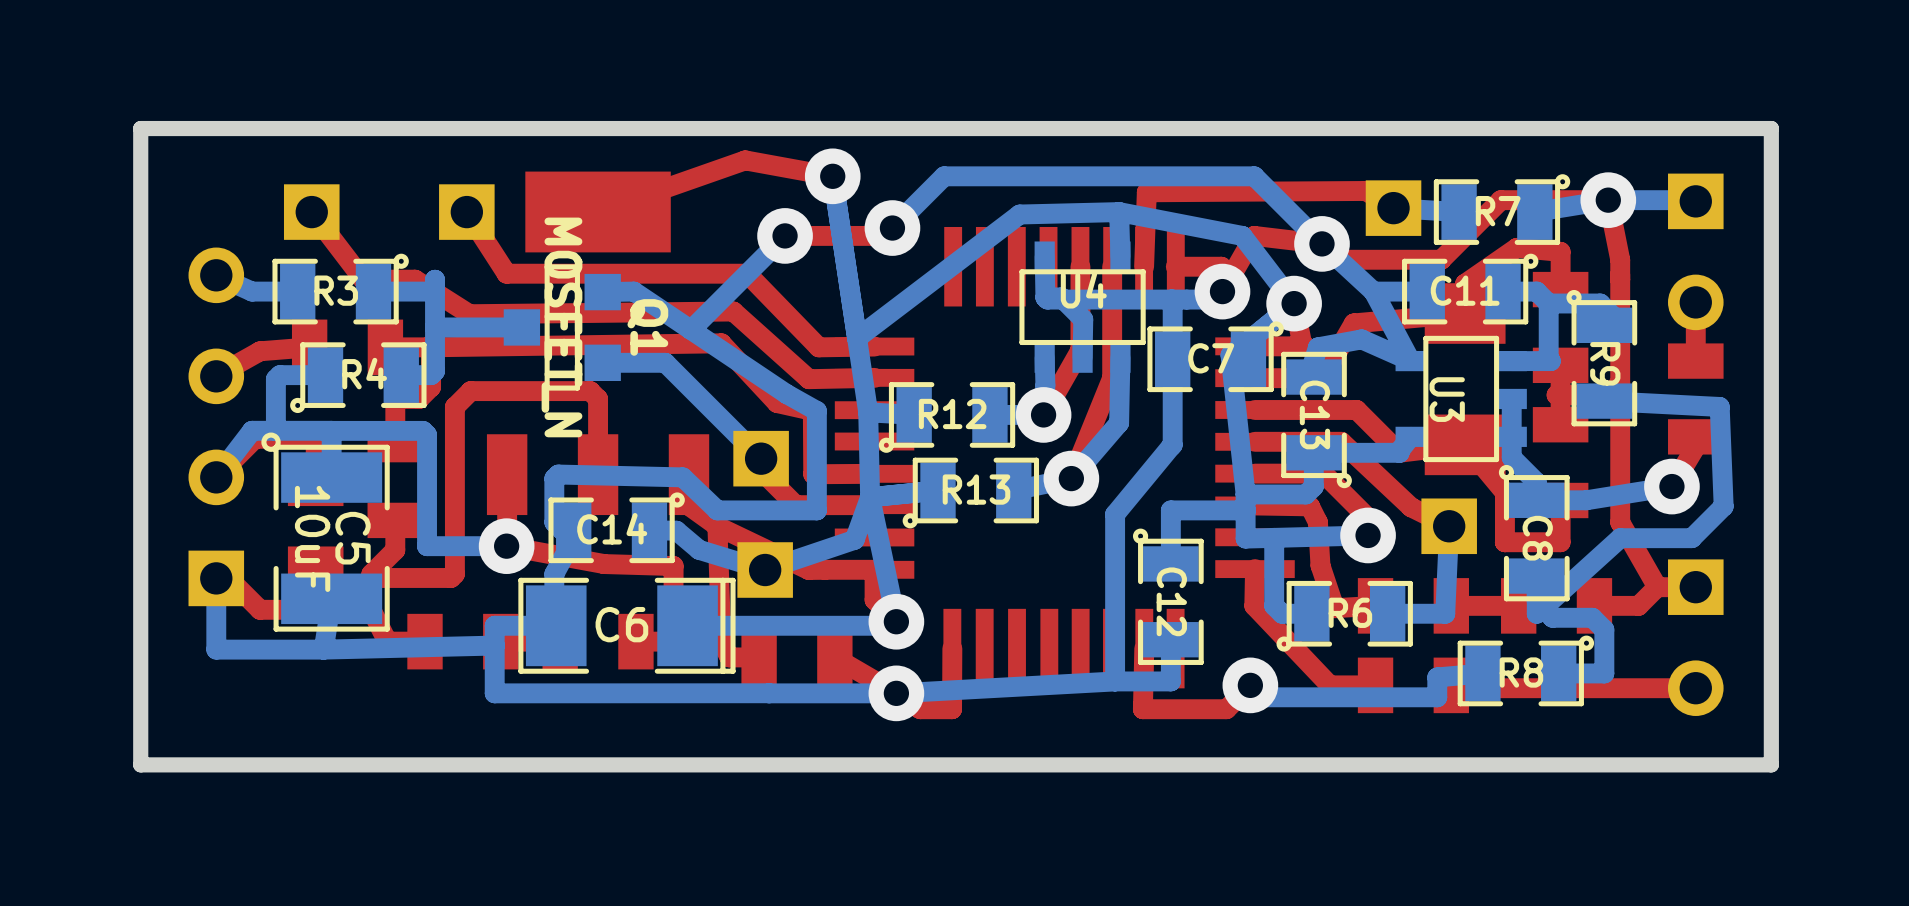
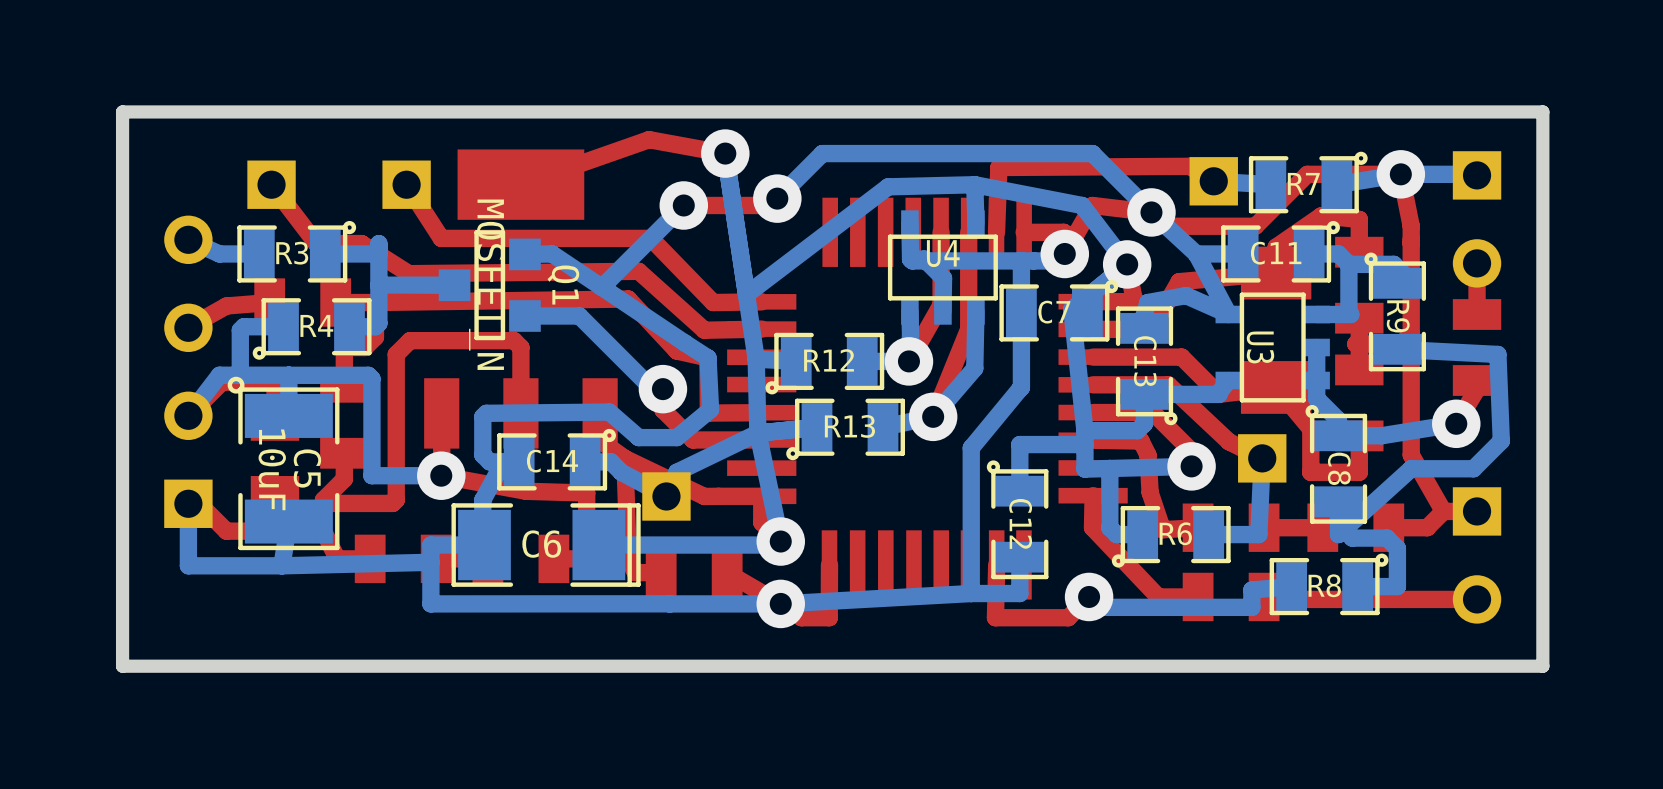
bottom track: (786, 393) (816, 410) (816, 510) (717, 510) (682, 477) (558, 474) -> (685, 343) (707, 357) (710, 409) (676, 437) (638, 437) (609, 412) (486, 413)
via: none -> (662, 389)
part: (761, 458) -> none
bottom track: (870, 497) (854, 539) (765, 570) (699, 549) (676, 530) (649, 530) -> (757, 433) (676, 472) (666, 496) (621, 472) (611, 461) (585, 461)
C14 position: (616, 527) -> (556, 459)

